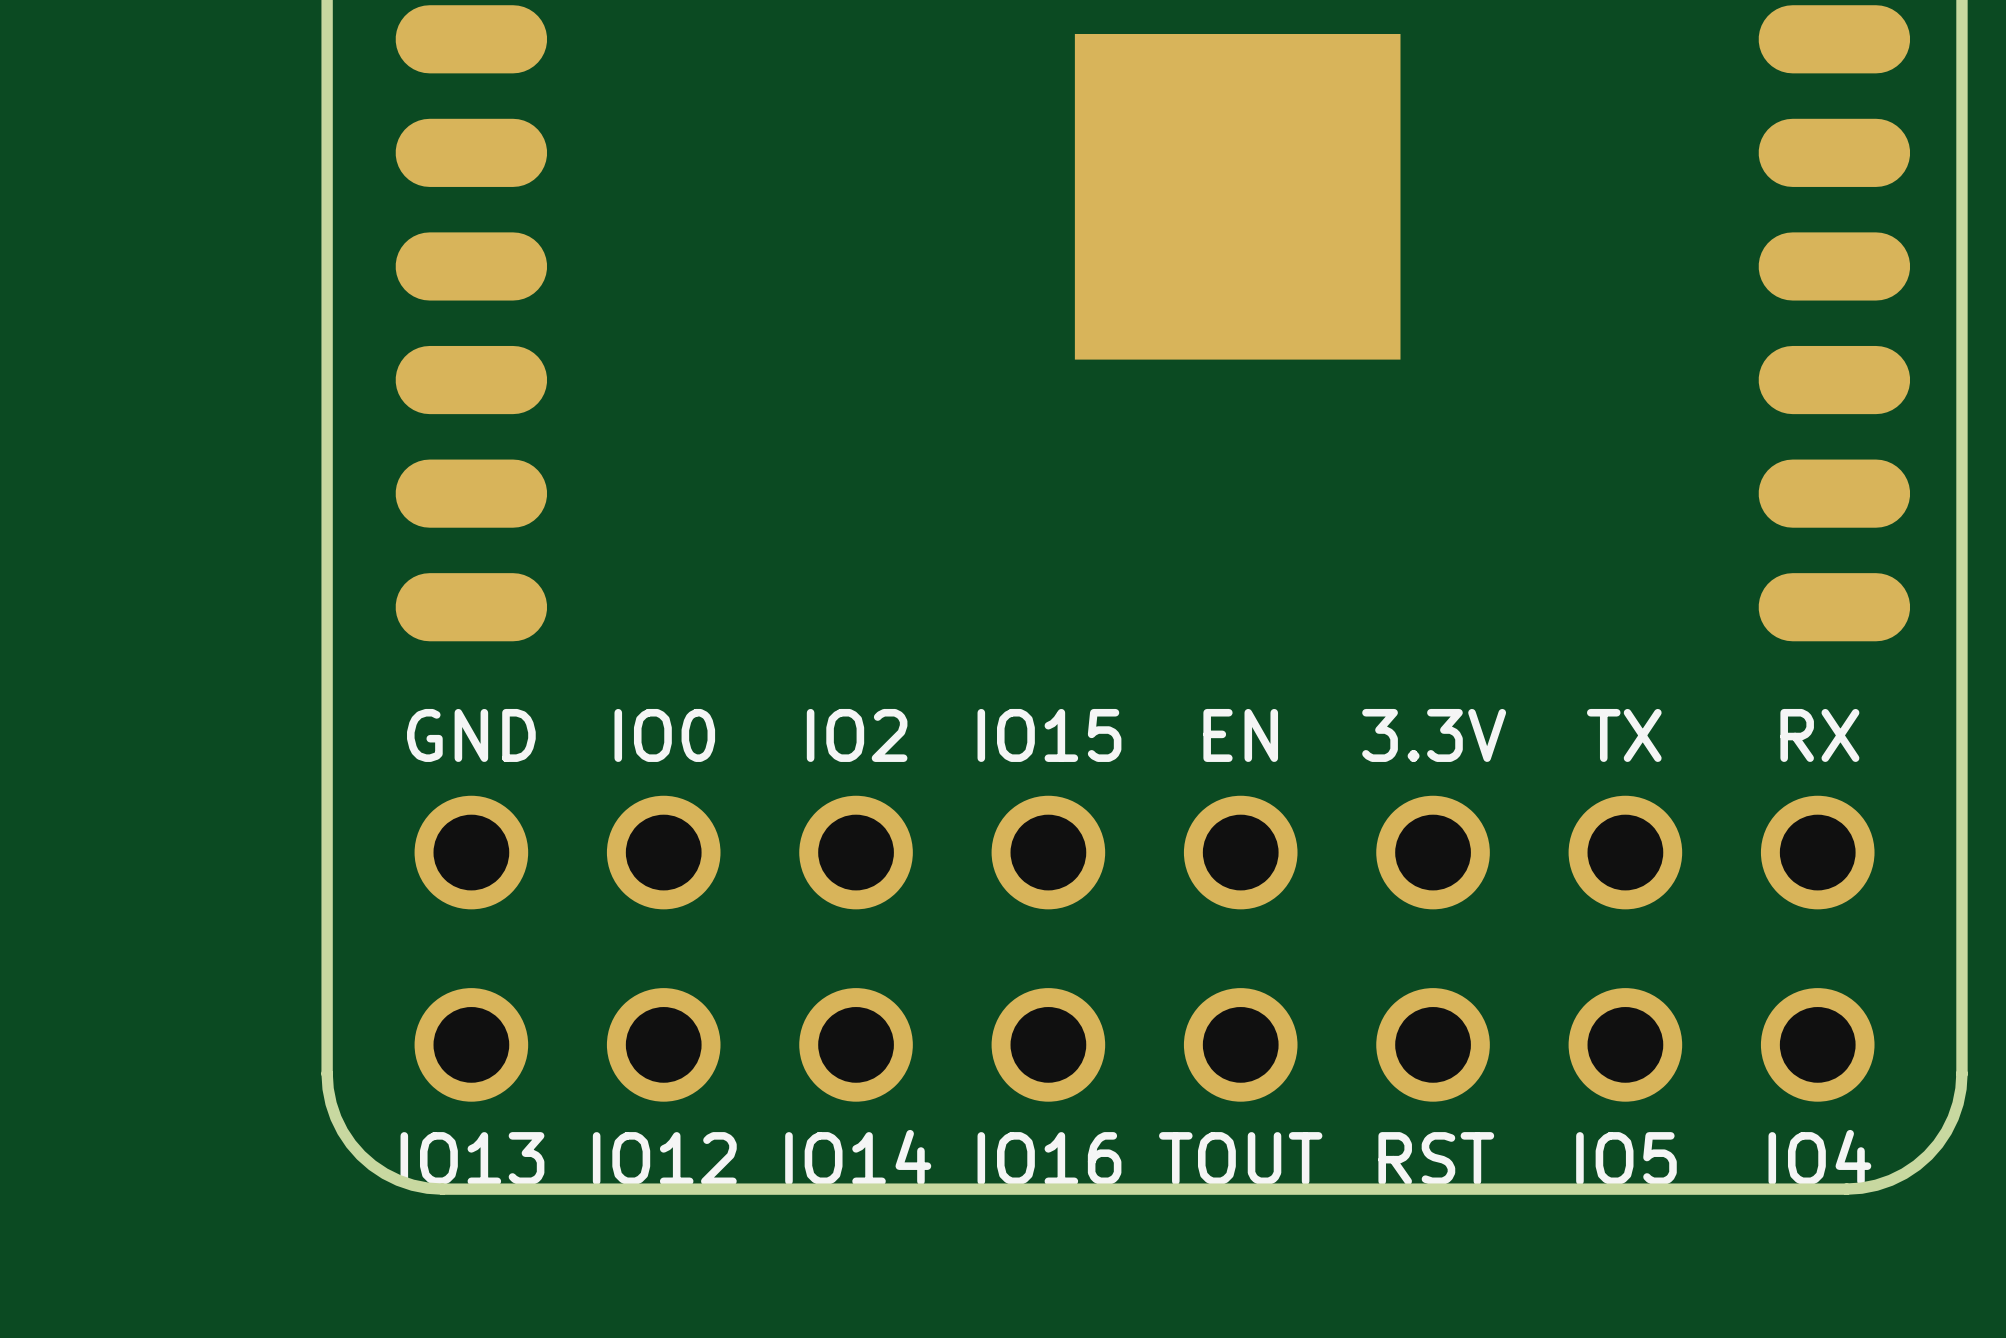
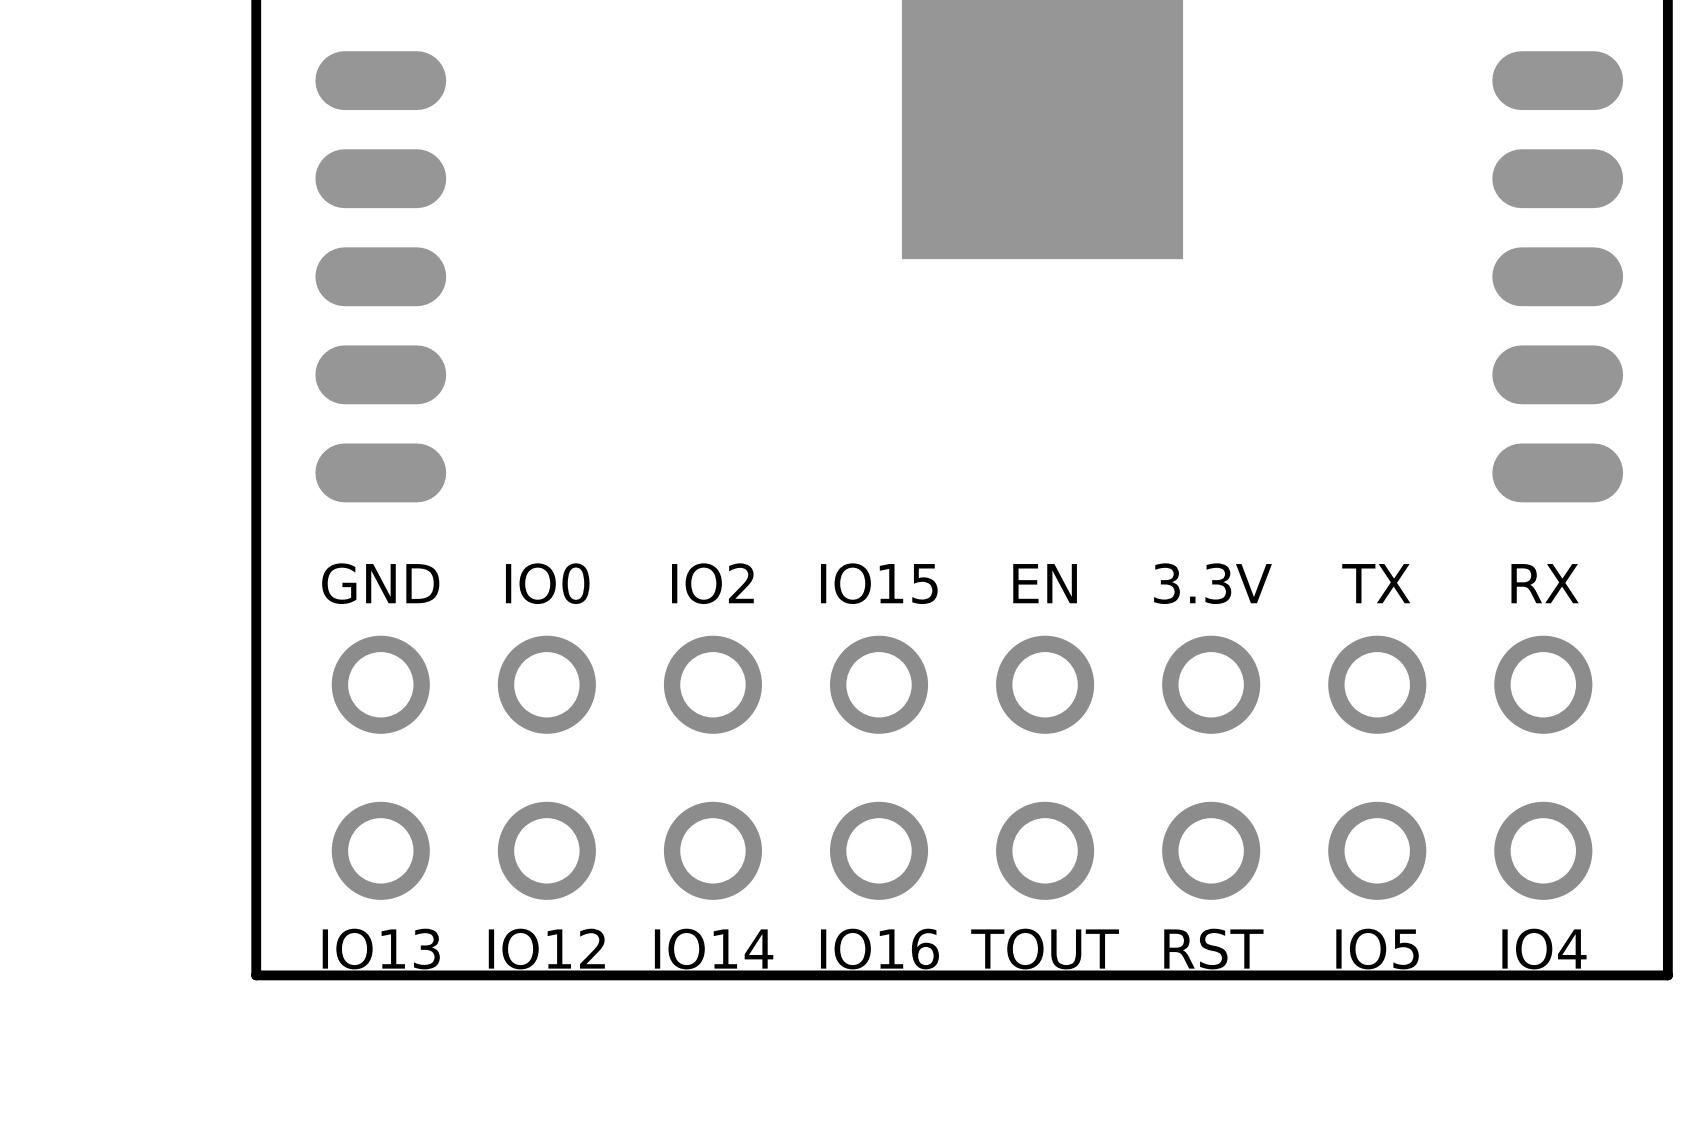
board edge: (327, 1073) (328, 1088) (335, 1117) (342, 1131) (360, 1155) (372, 1165) (398, 1180) (412, 1185) (442, 1189) -> (256, 875) (256, 975) (355, 975)
board edge: (1961, 1073) (1960, 1088) (1953, 1117) (1946, 1131) (1928, 1155) (1916, 1165) (1890, 1180) (1876, 1185) (1846, 1189) -> (1667, 875) (1667, 975) (1568, 975)

